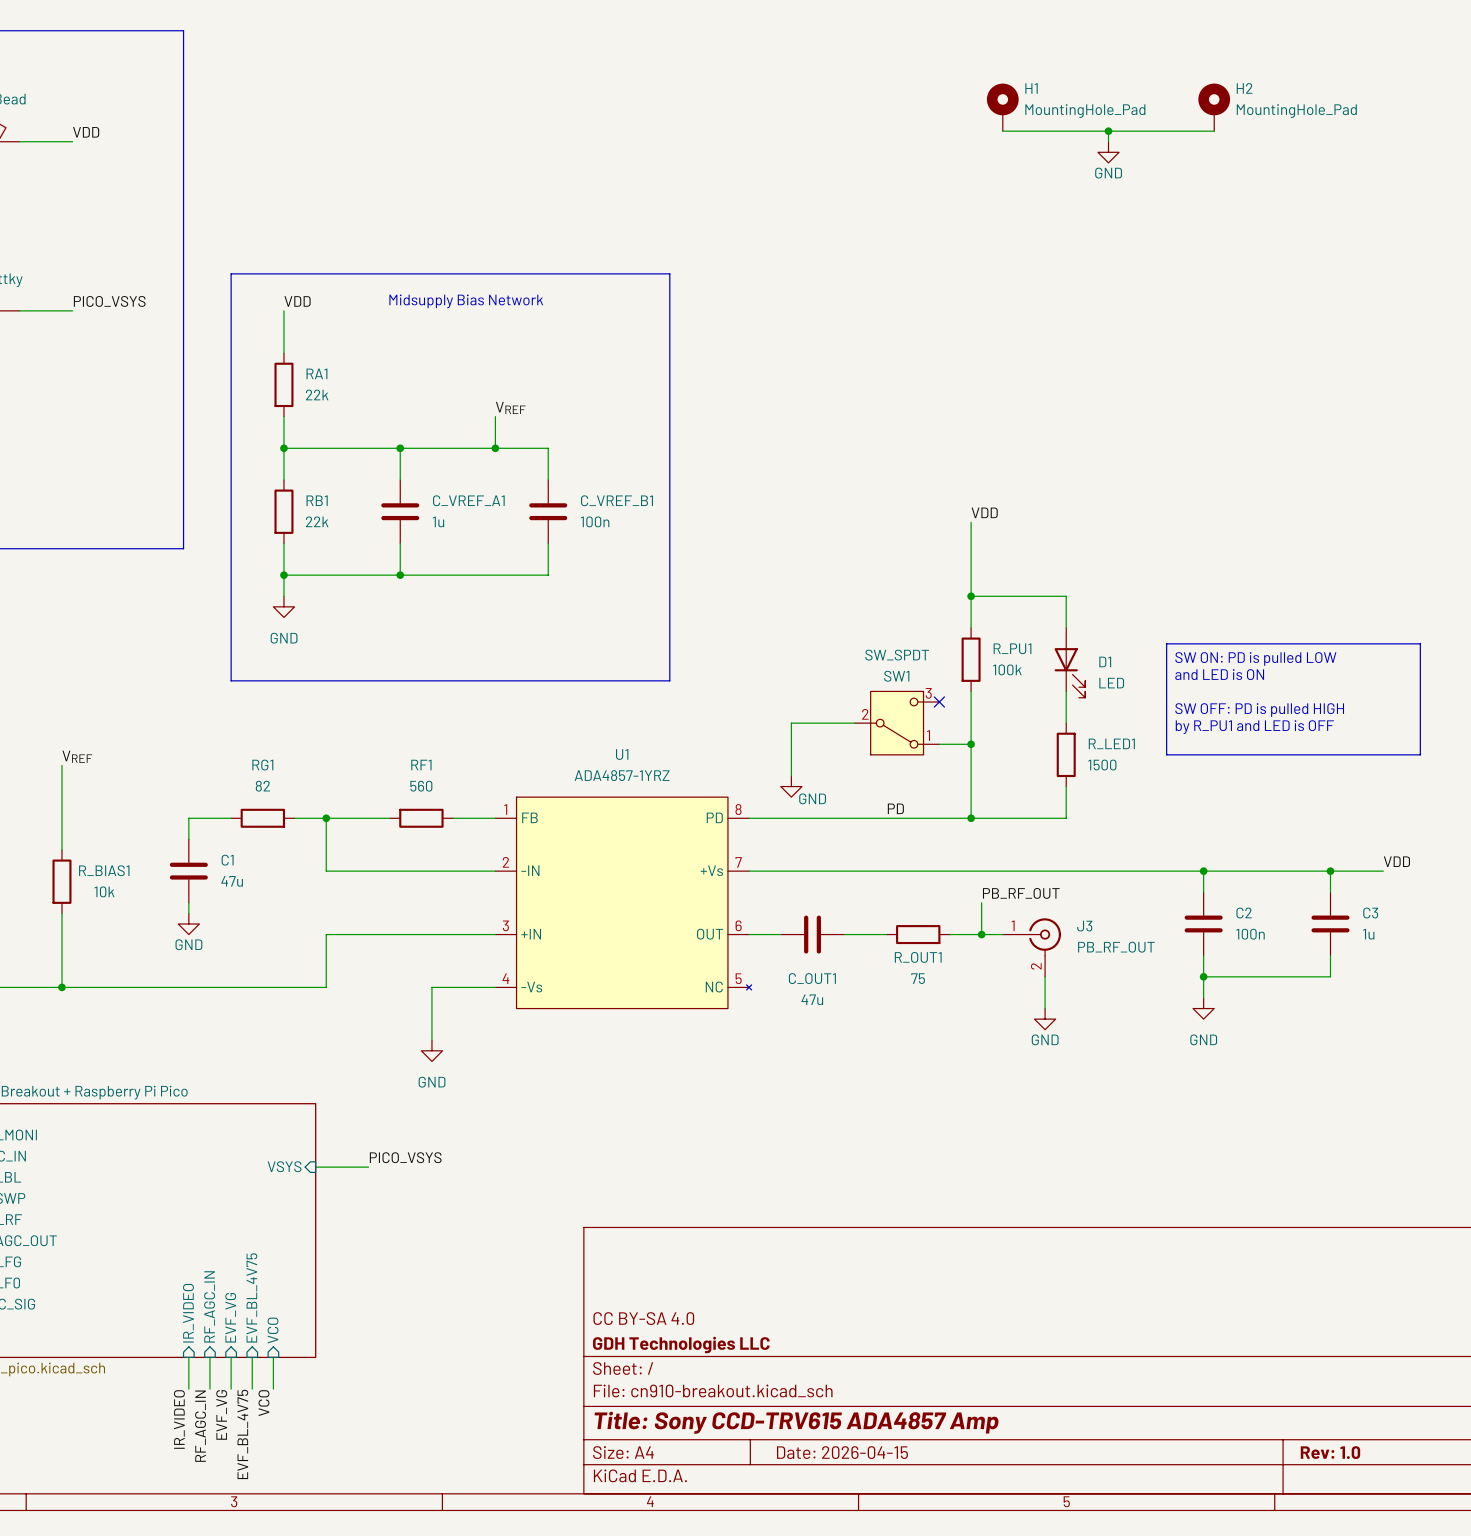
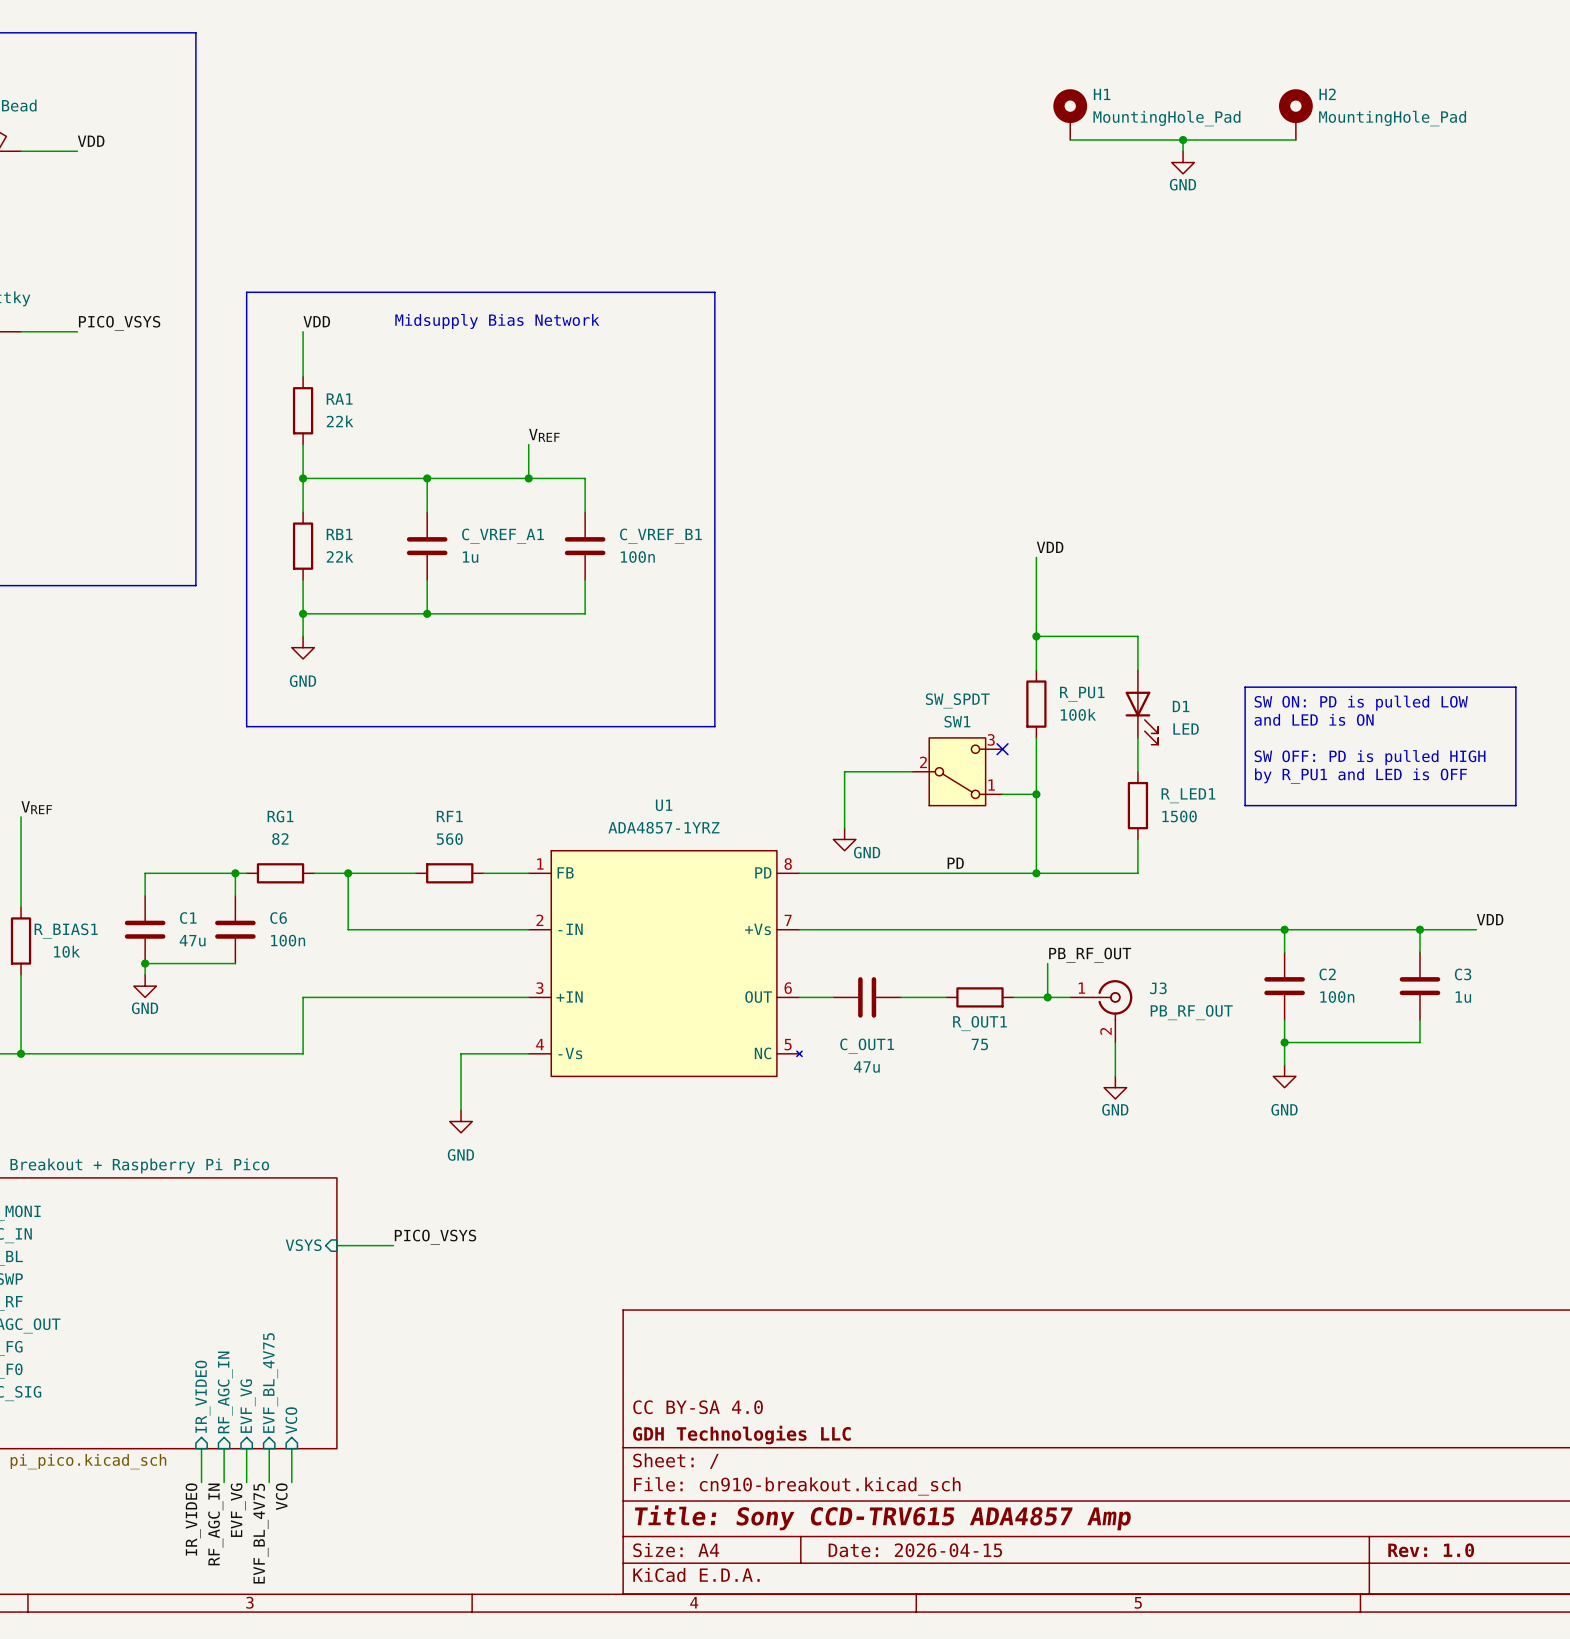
label position: VREF (77, 756) -> VREF (36, 807)
wire: (61, 765) (61, 849) -> (21, 816) (21, 907)
wire: (188, 818) (188, 839) -> (201, 873) (145, 873) (145, 895)
wire: none -> (235, 873) (235, 895)
junction: none -> (235, 873)
C1 position: (188, 871) -> (145, 929)
C6: none -> 100n (235, 929)
R_BIAS1 position: (61, 881) -> (21, 941)
junction: none -> (145, 963)
wire: (188, 902) (188, 913) -> none
wire: none -> (235, 963) (145, 963) (145, 974)
wire: (61, 913) (61, 987) -> (21, 974) (21, 1053)
power symbol position: GND (188, 923) -> GND (145, 986)
wire: (326, 934) (326, 987) (283, 987) -> (348, 997) (303, 997) (303, 1053)
junction position: (61, 987) -> (21, 1053)

